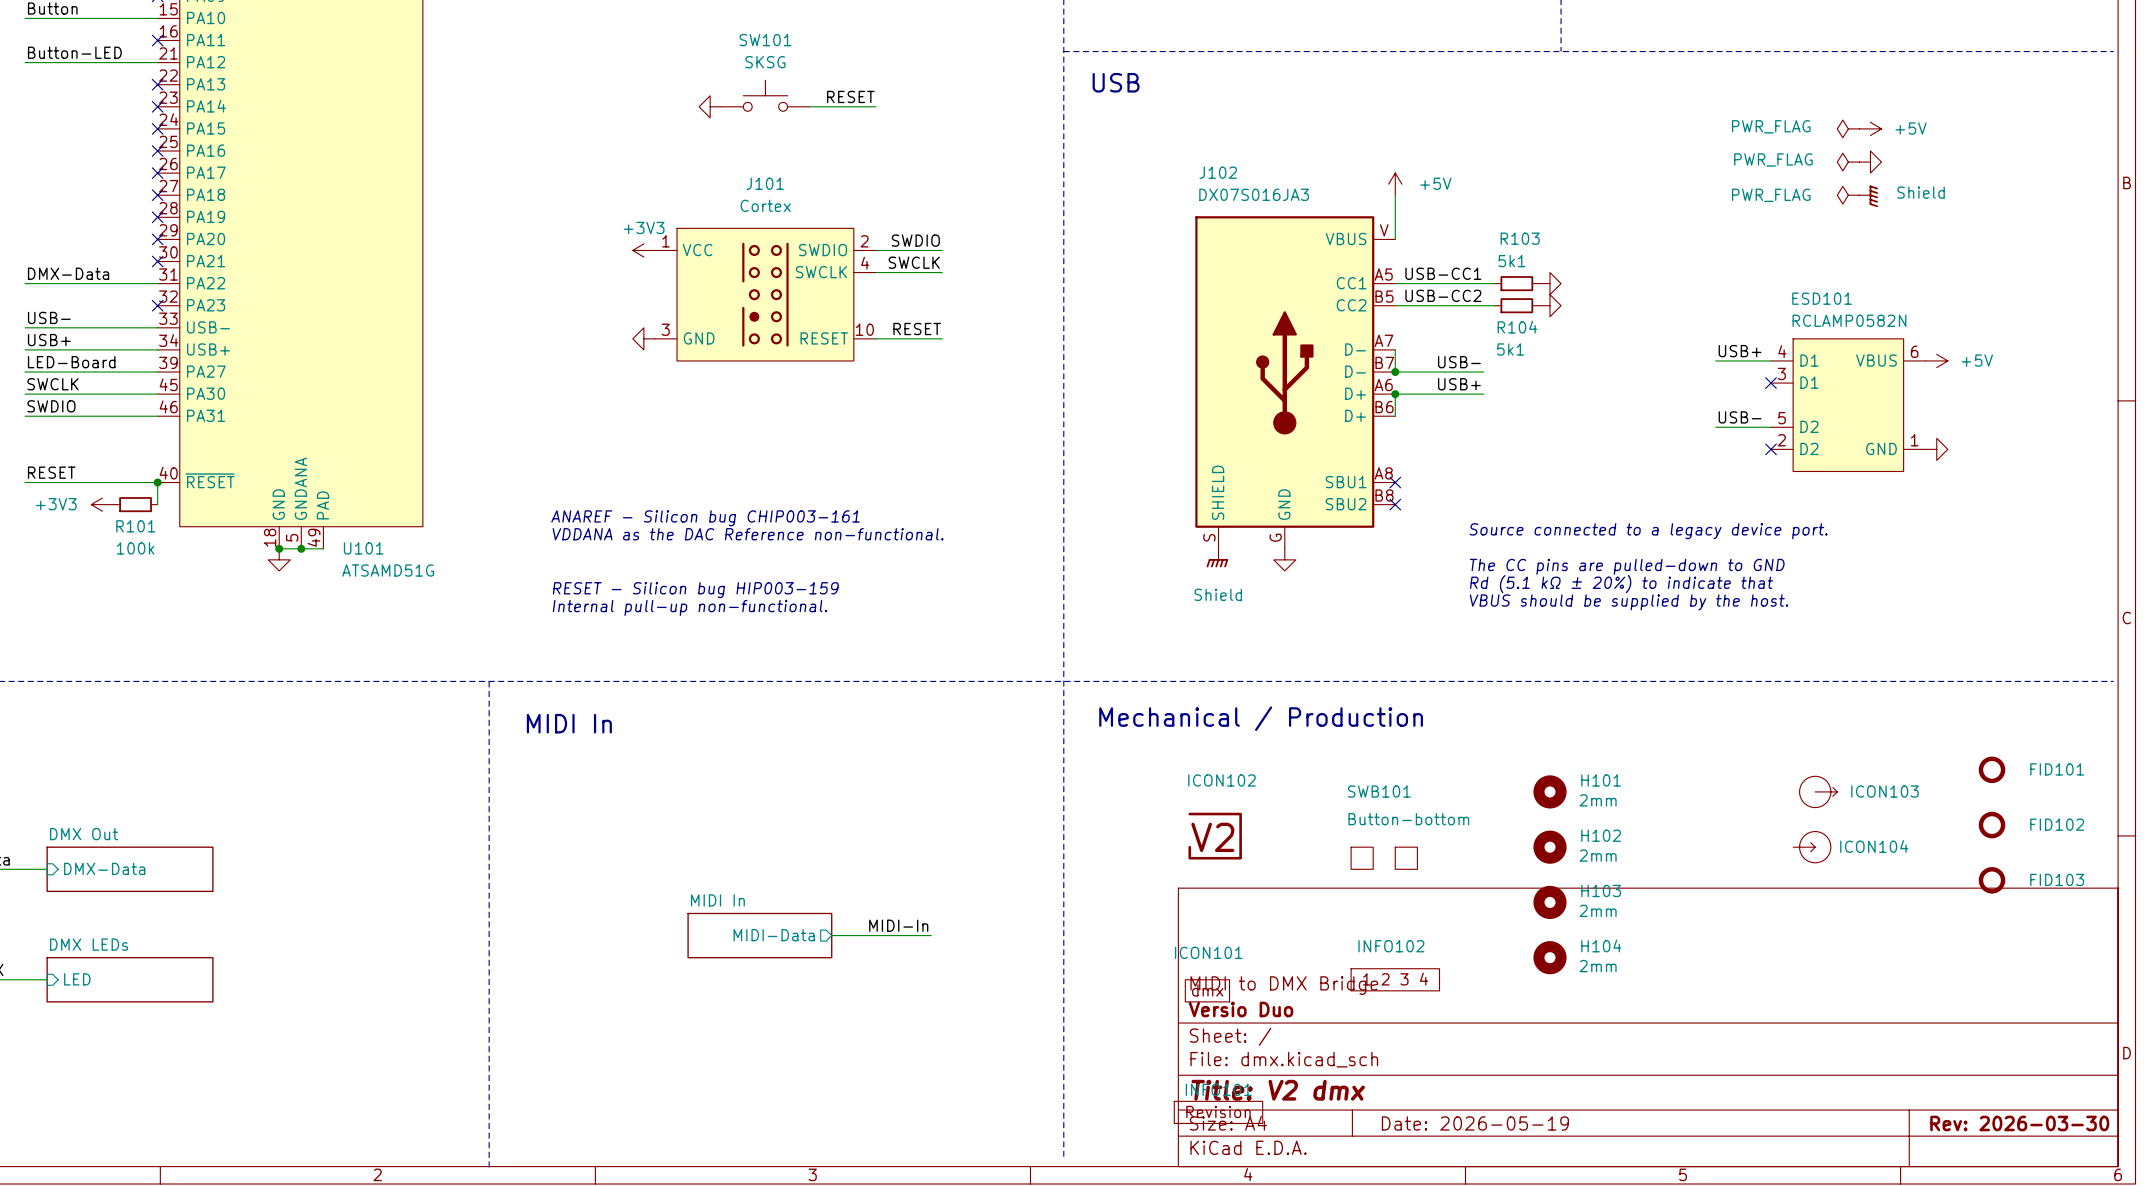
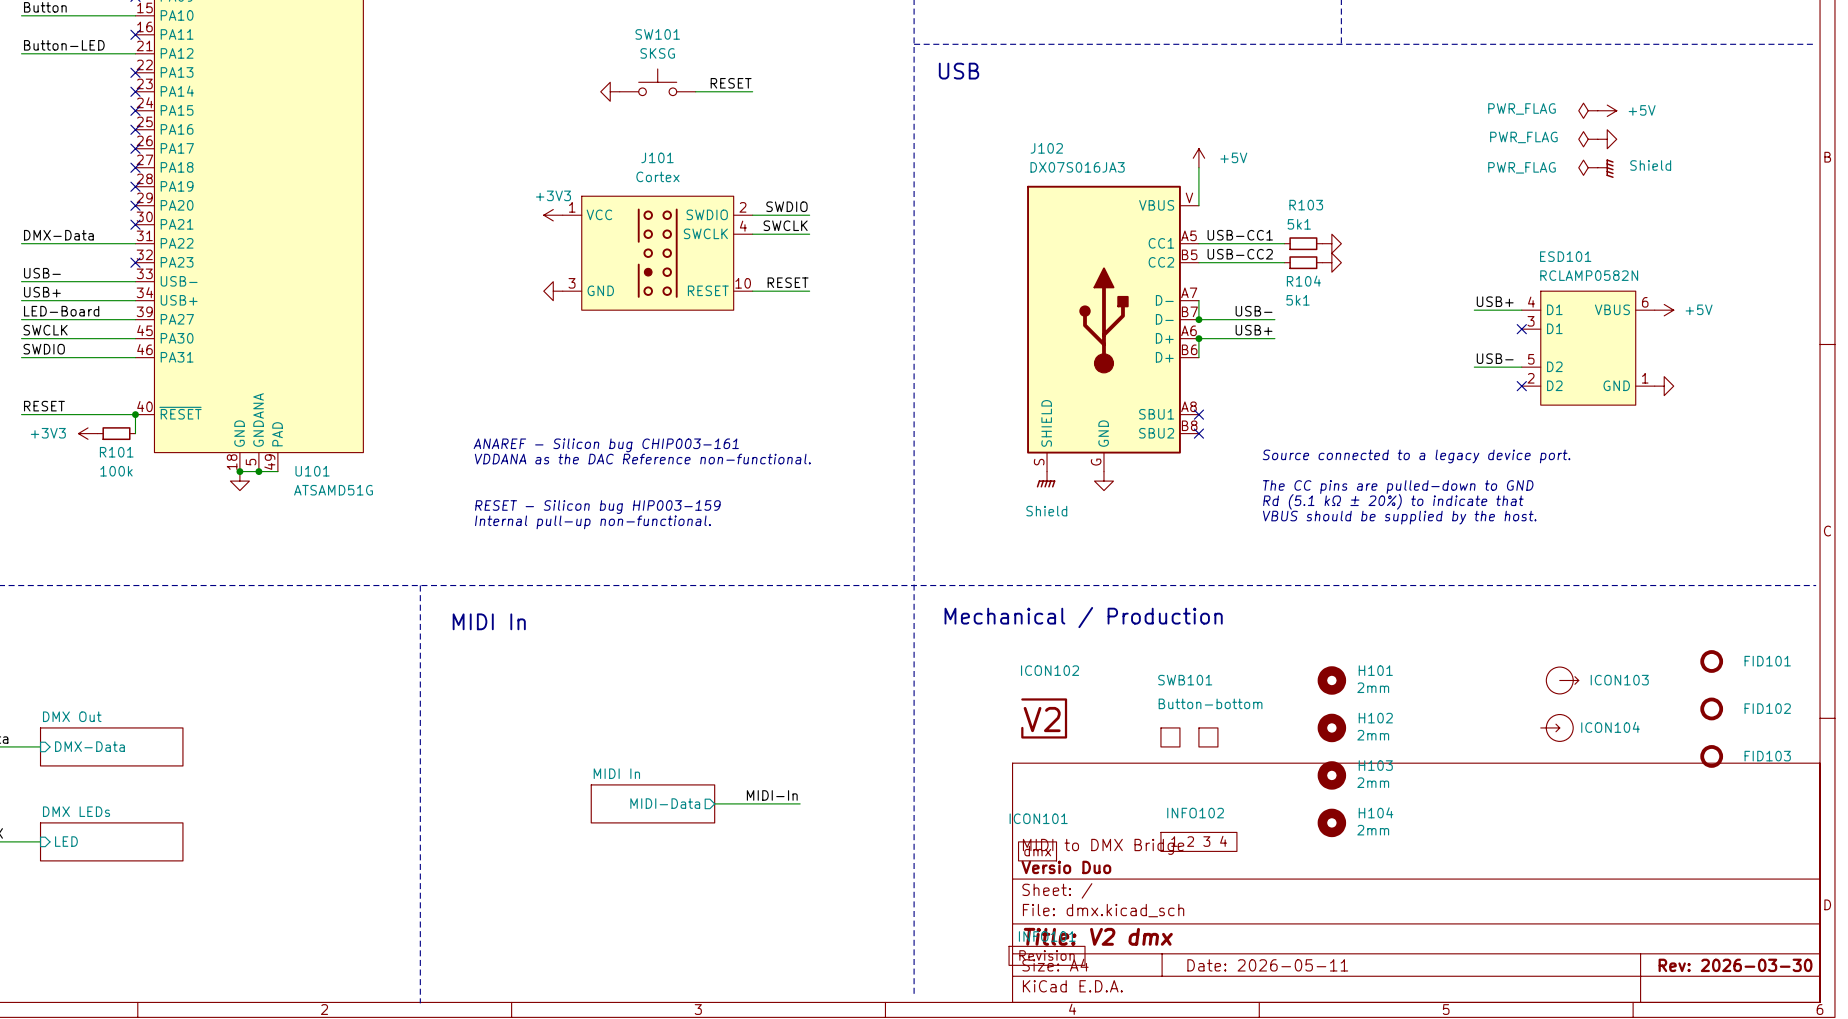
title block: Date: 2026-05-19 (1475, 1123) -> Date: 2026-05-11 (1267, 965)

